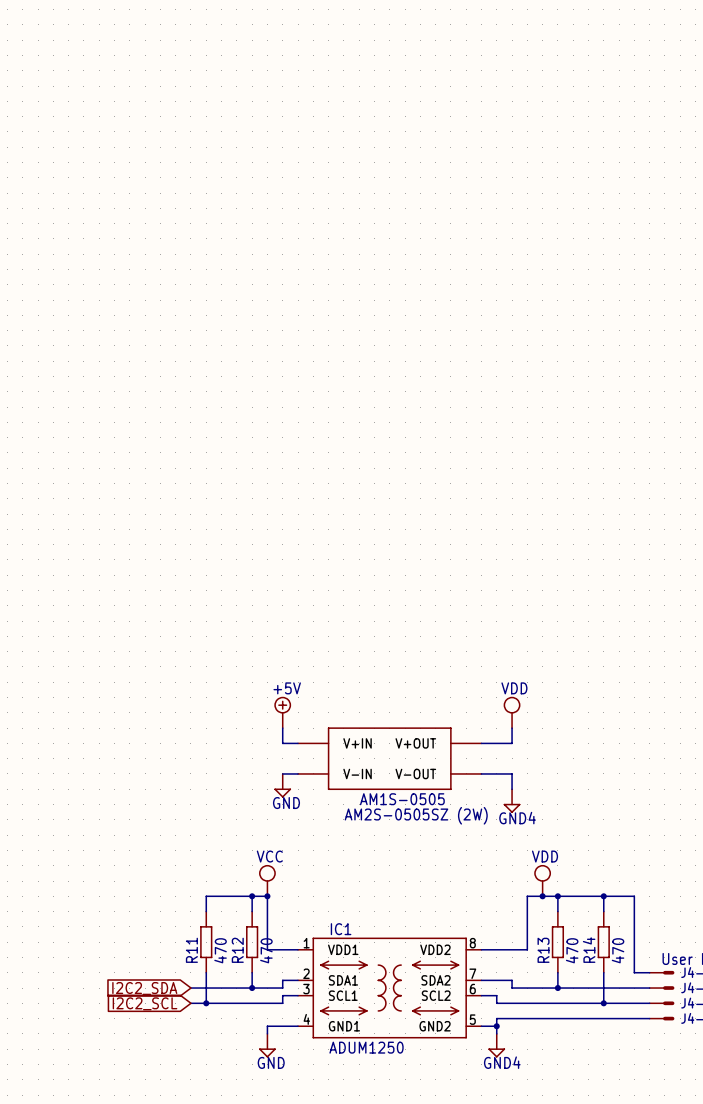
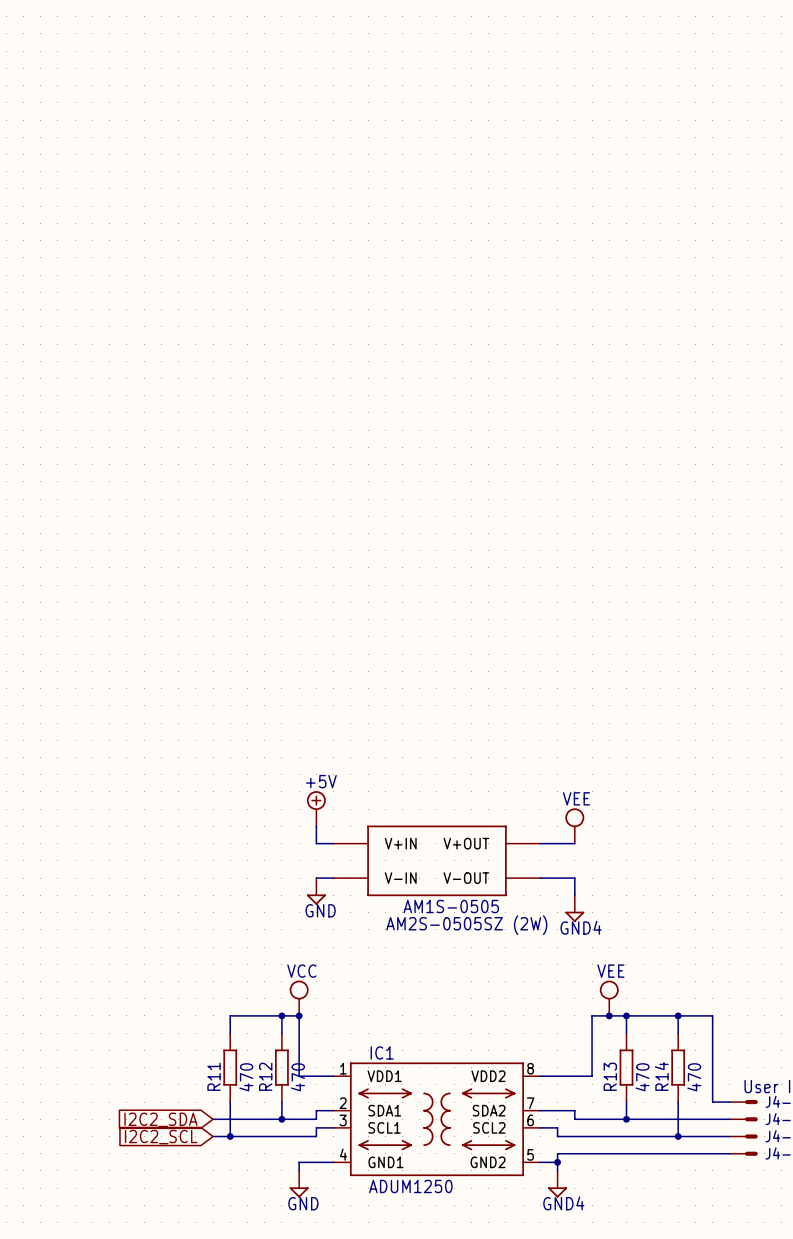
power symbol: VDD (512, 712) -> none
power symbol: none -> VEE (574, 825)
power symbol: VDD (542, 880) -> VEE (609, 998)

